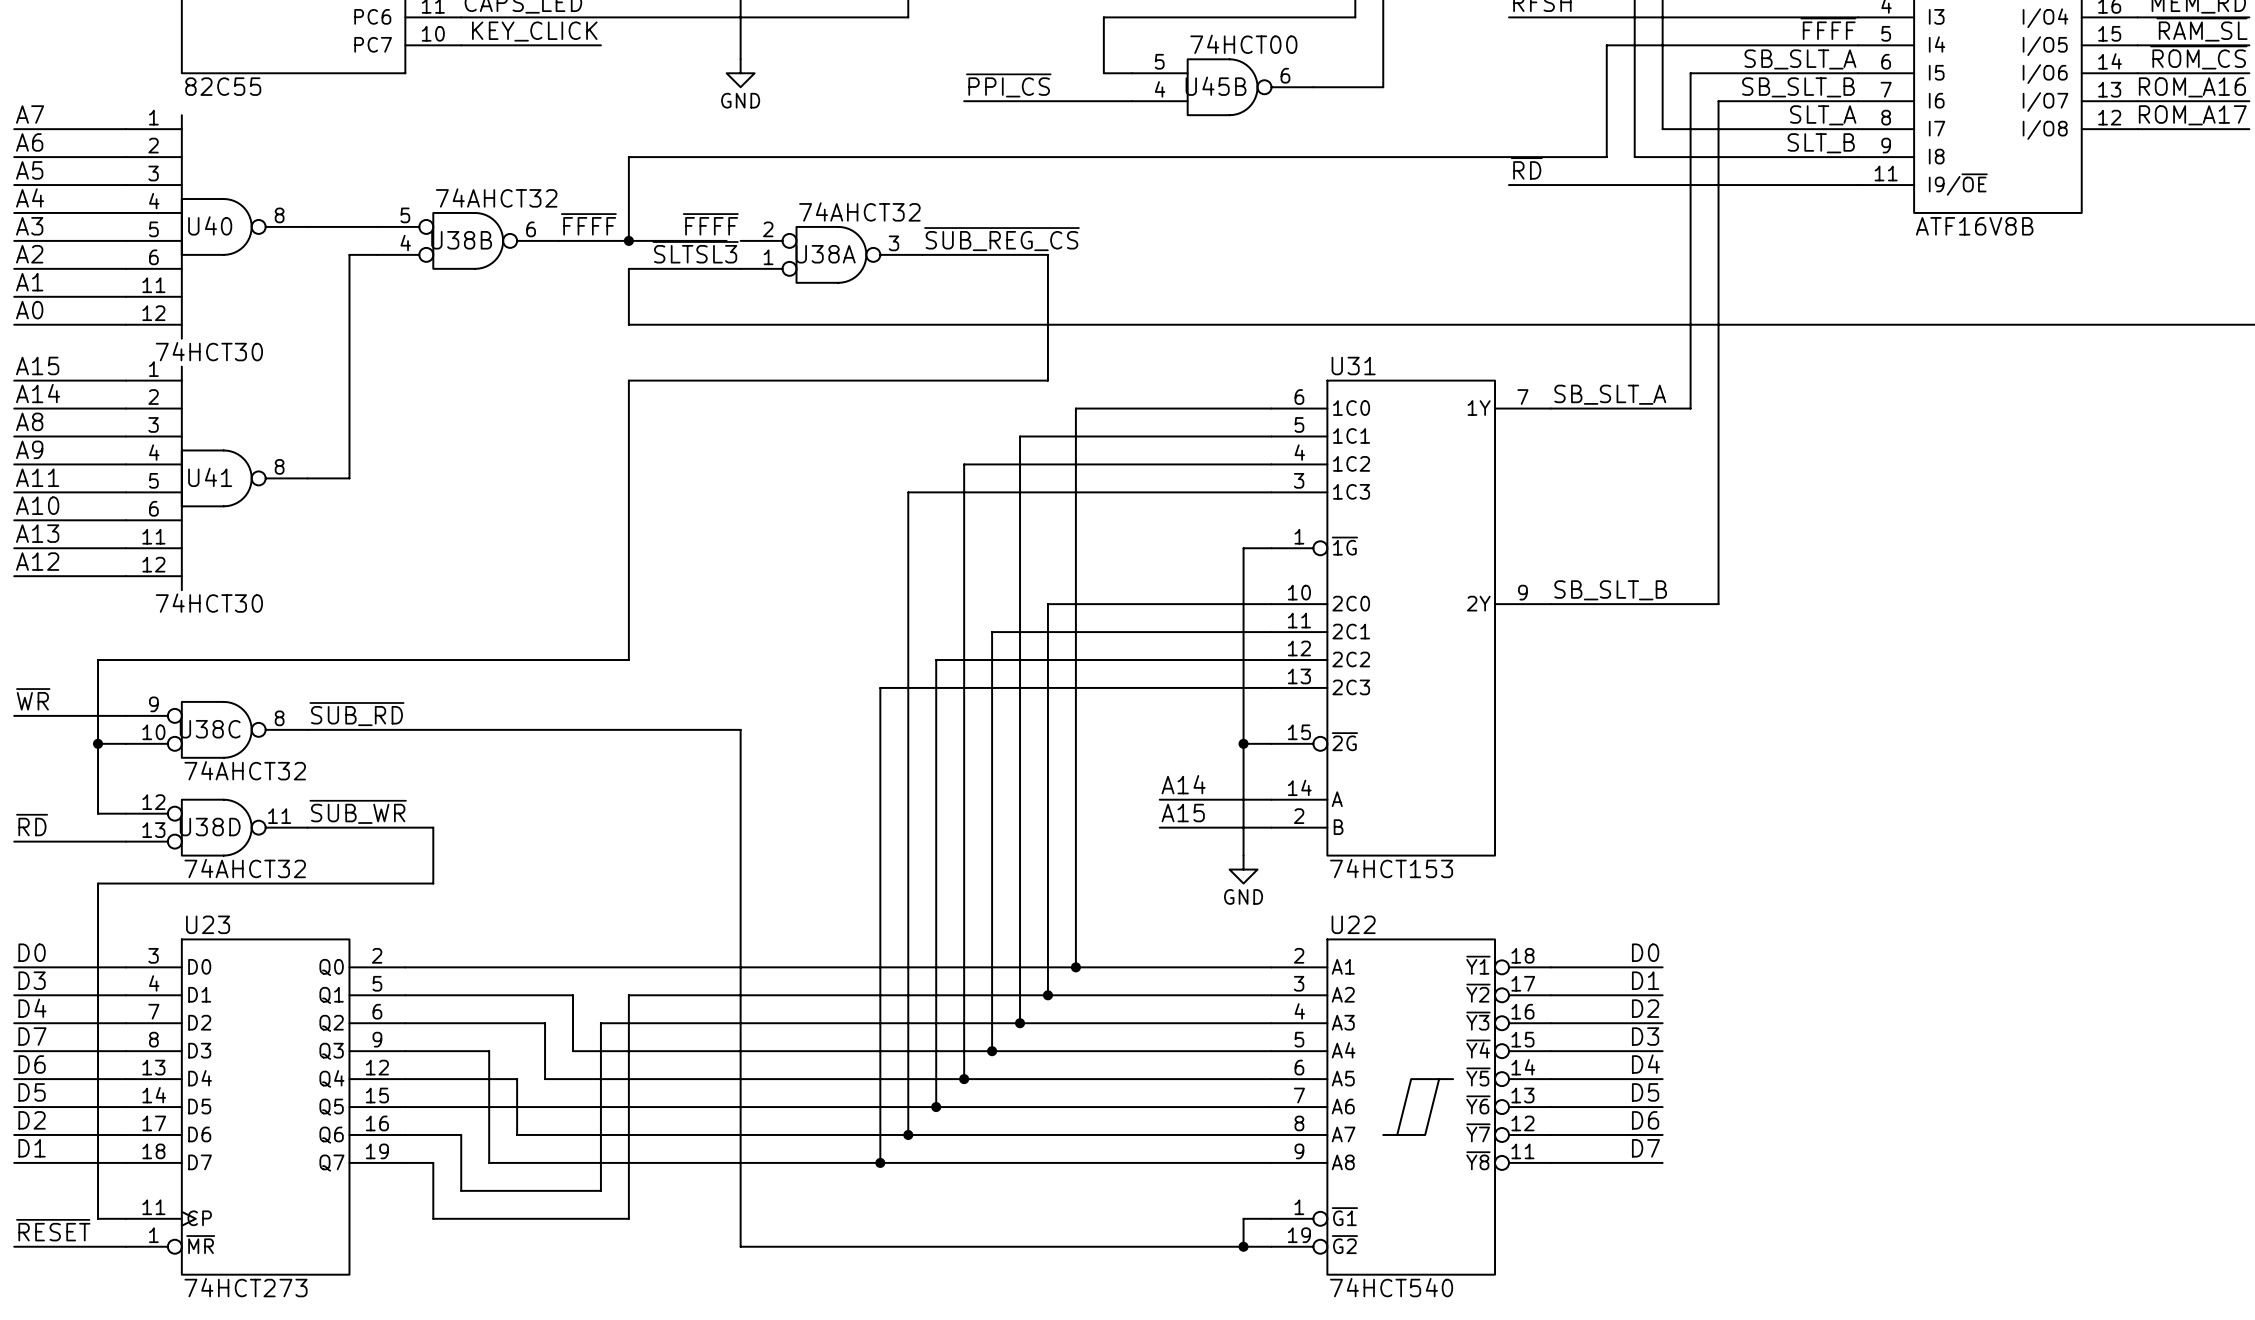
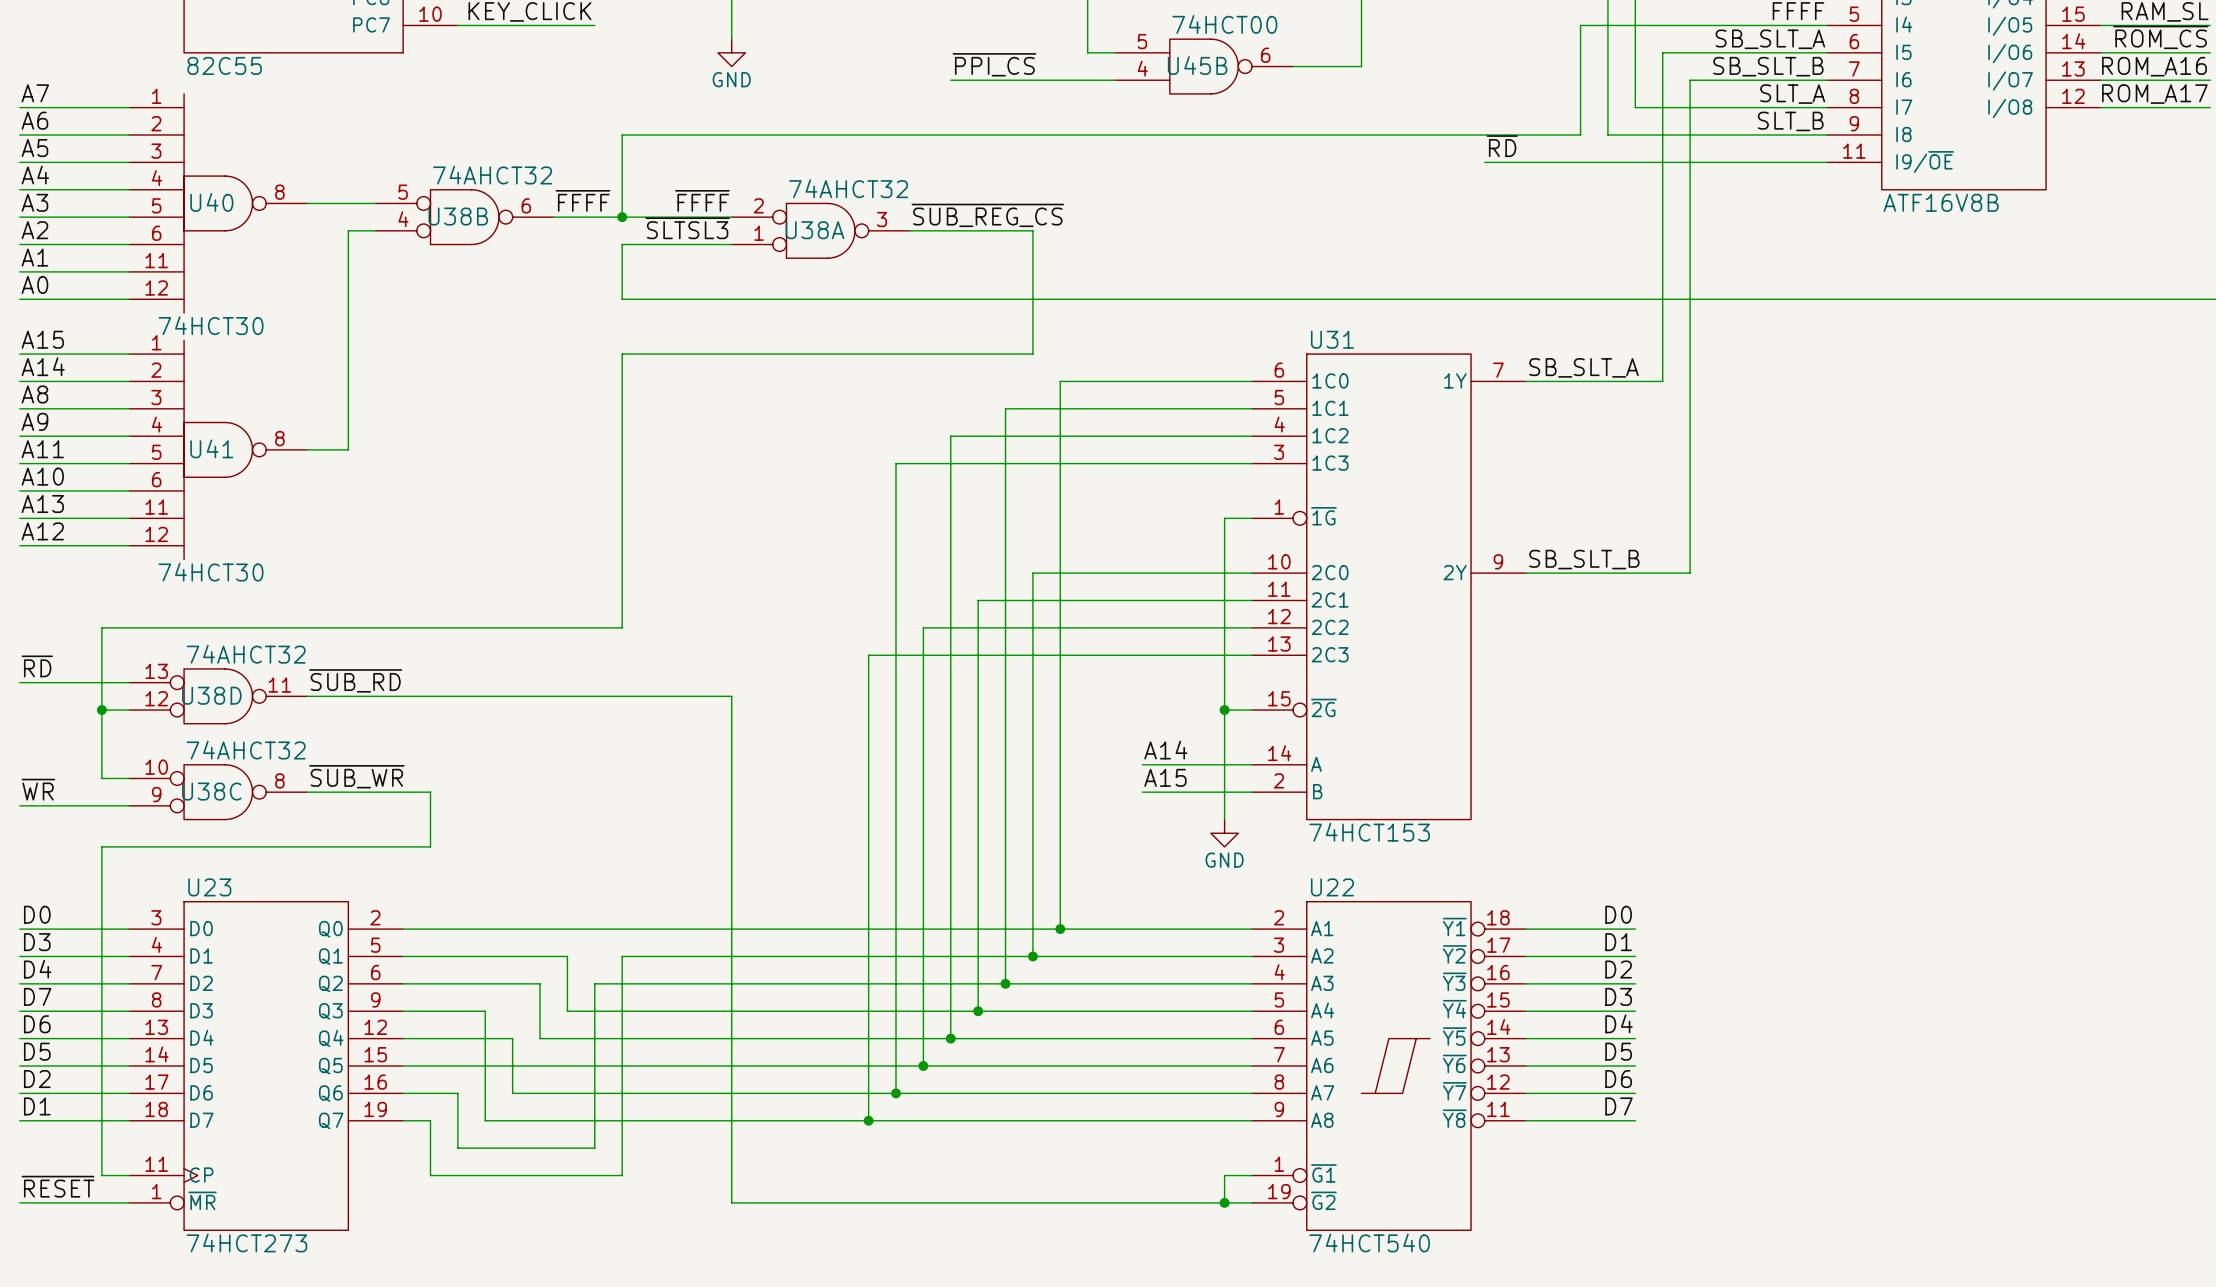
wire: none -> (718, 217) (731, 217)
label: ~{WR} (33, 699) -> ~{RD} (37, 666)
U38C flip: as is (216, 729) -> up-down (218, 792)
label: ~{RD} (32, 825) -> ~{WR} (38, 789)
U38D flip: as is (216, 827) -> up-down (218, 696)

